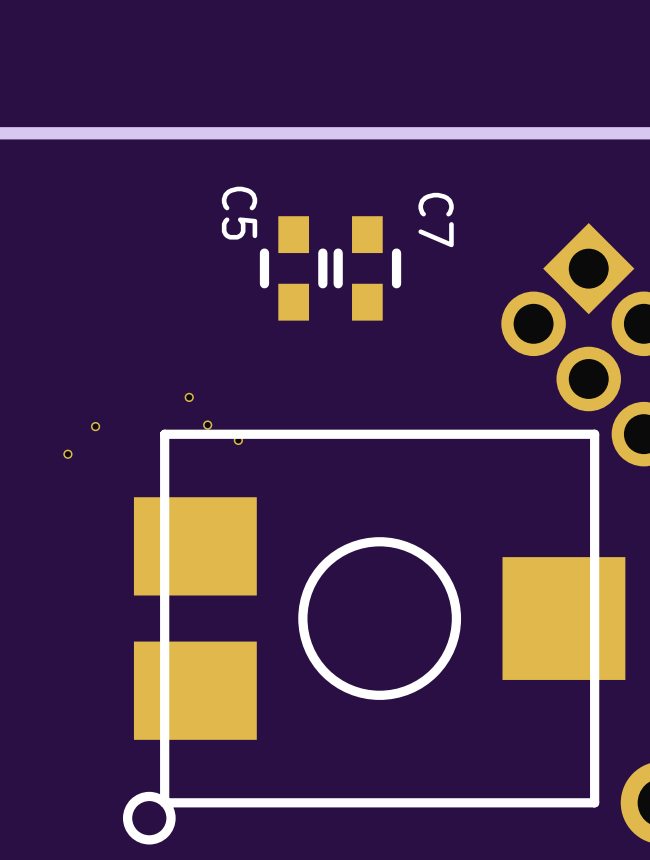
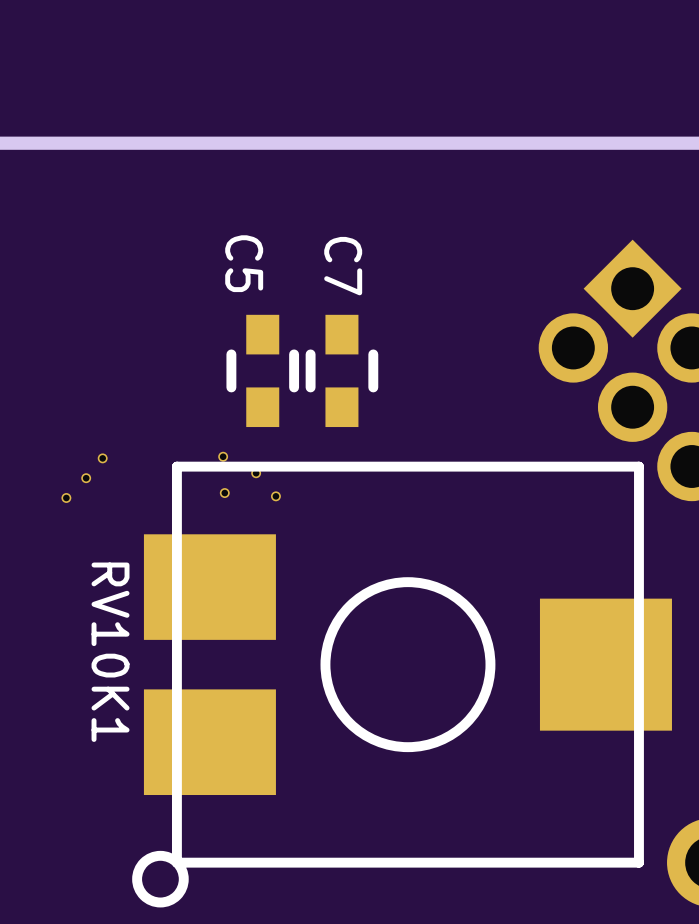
C5 name position: C5 (239, 213) -> C5 (244, 263)
C7 name position: C7 (436, 220) -> C7 (343, 266)
C5 position: (293, 268) -> (262, 370)
C7 position: (367, 268) -> (341, 370)
part: (189, 397) -> none
part: none -> (86, 478)
part: (67, 454) -> none
part: none -> (224, 493)
part: none -> (275, 496)
part: none -> (66, 497)
RV10K1 name: none -> RV10K1 (110, 652)

